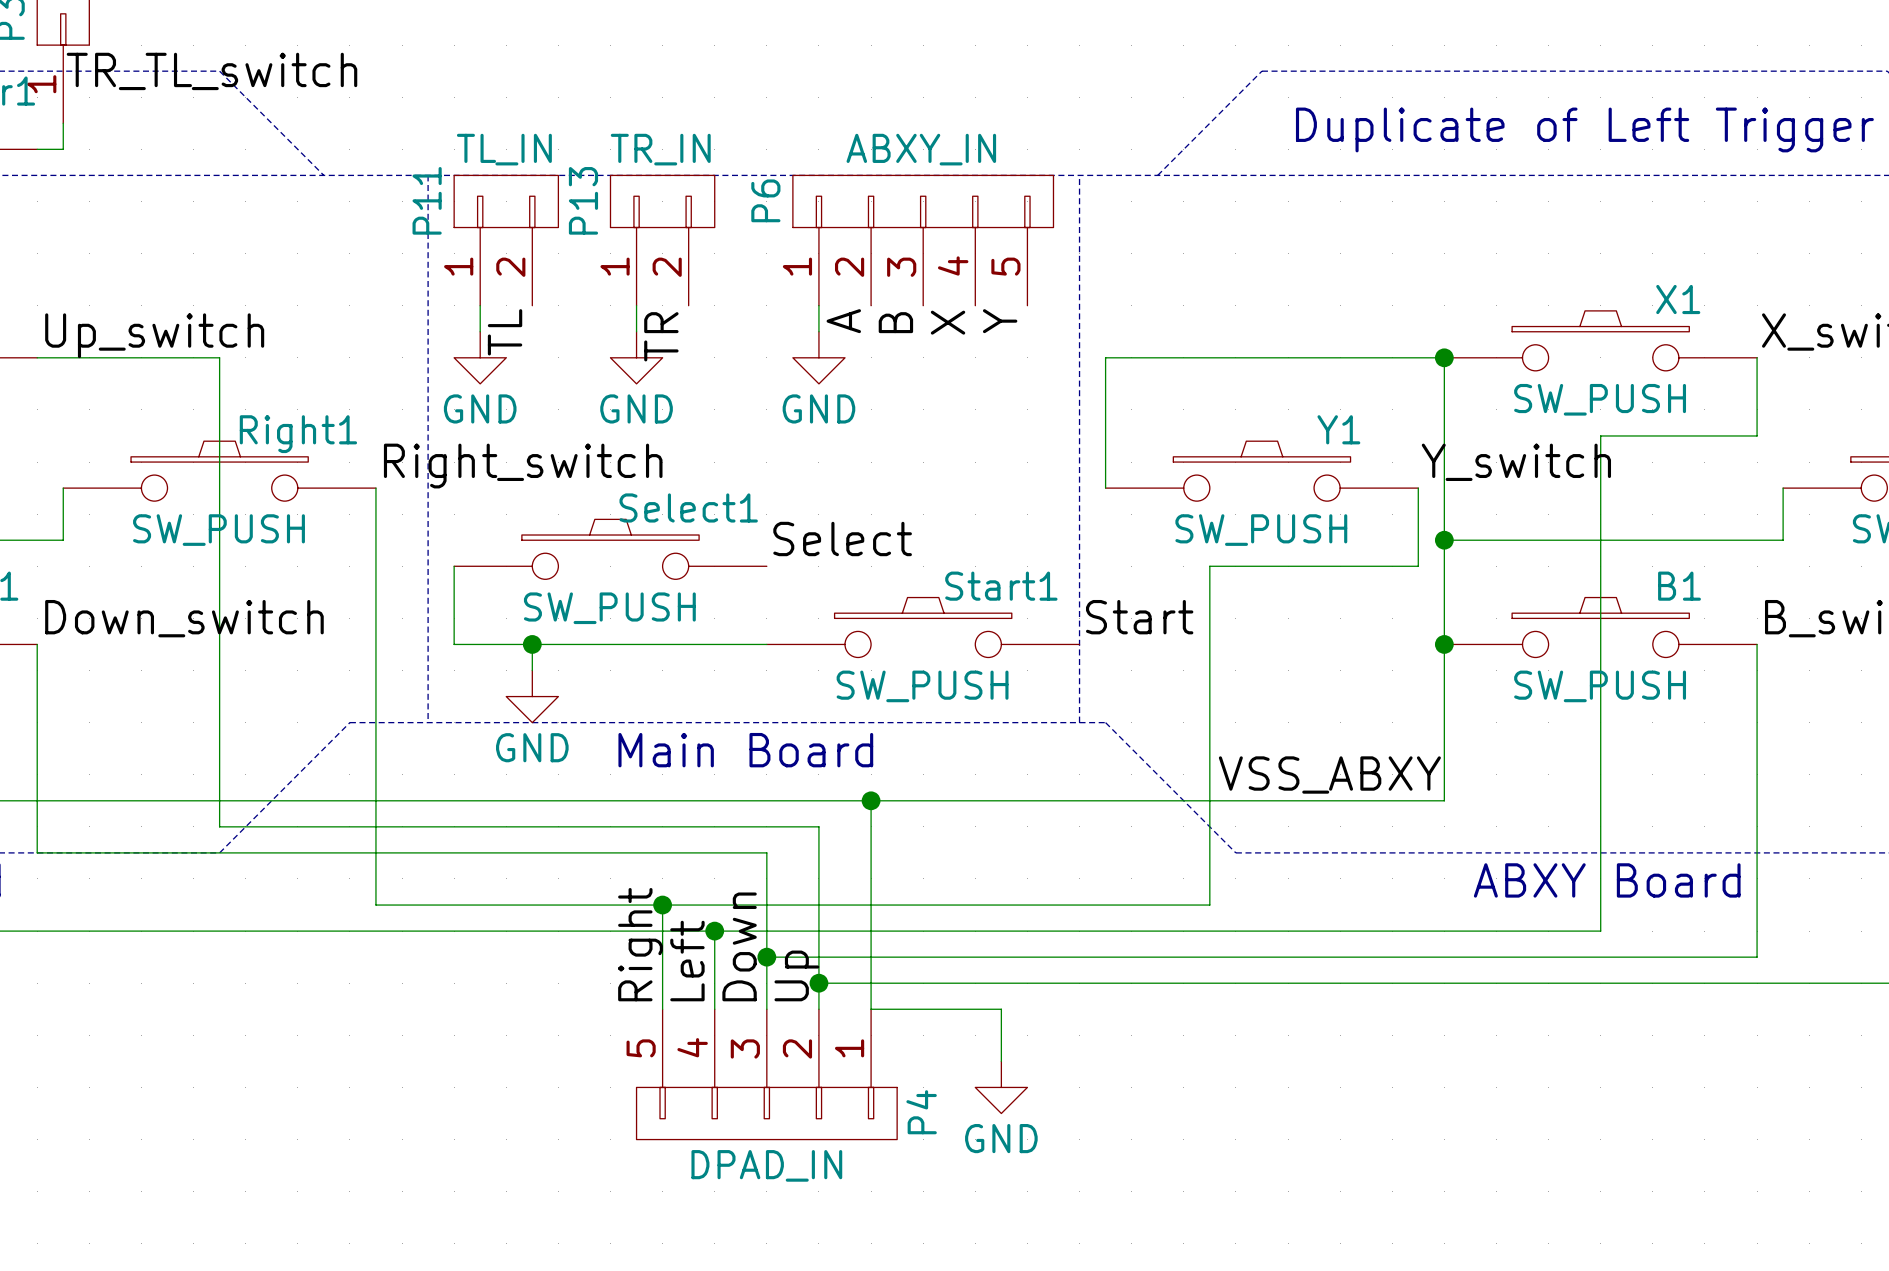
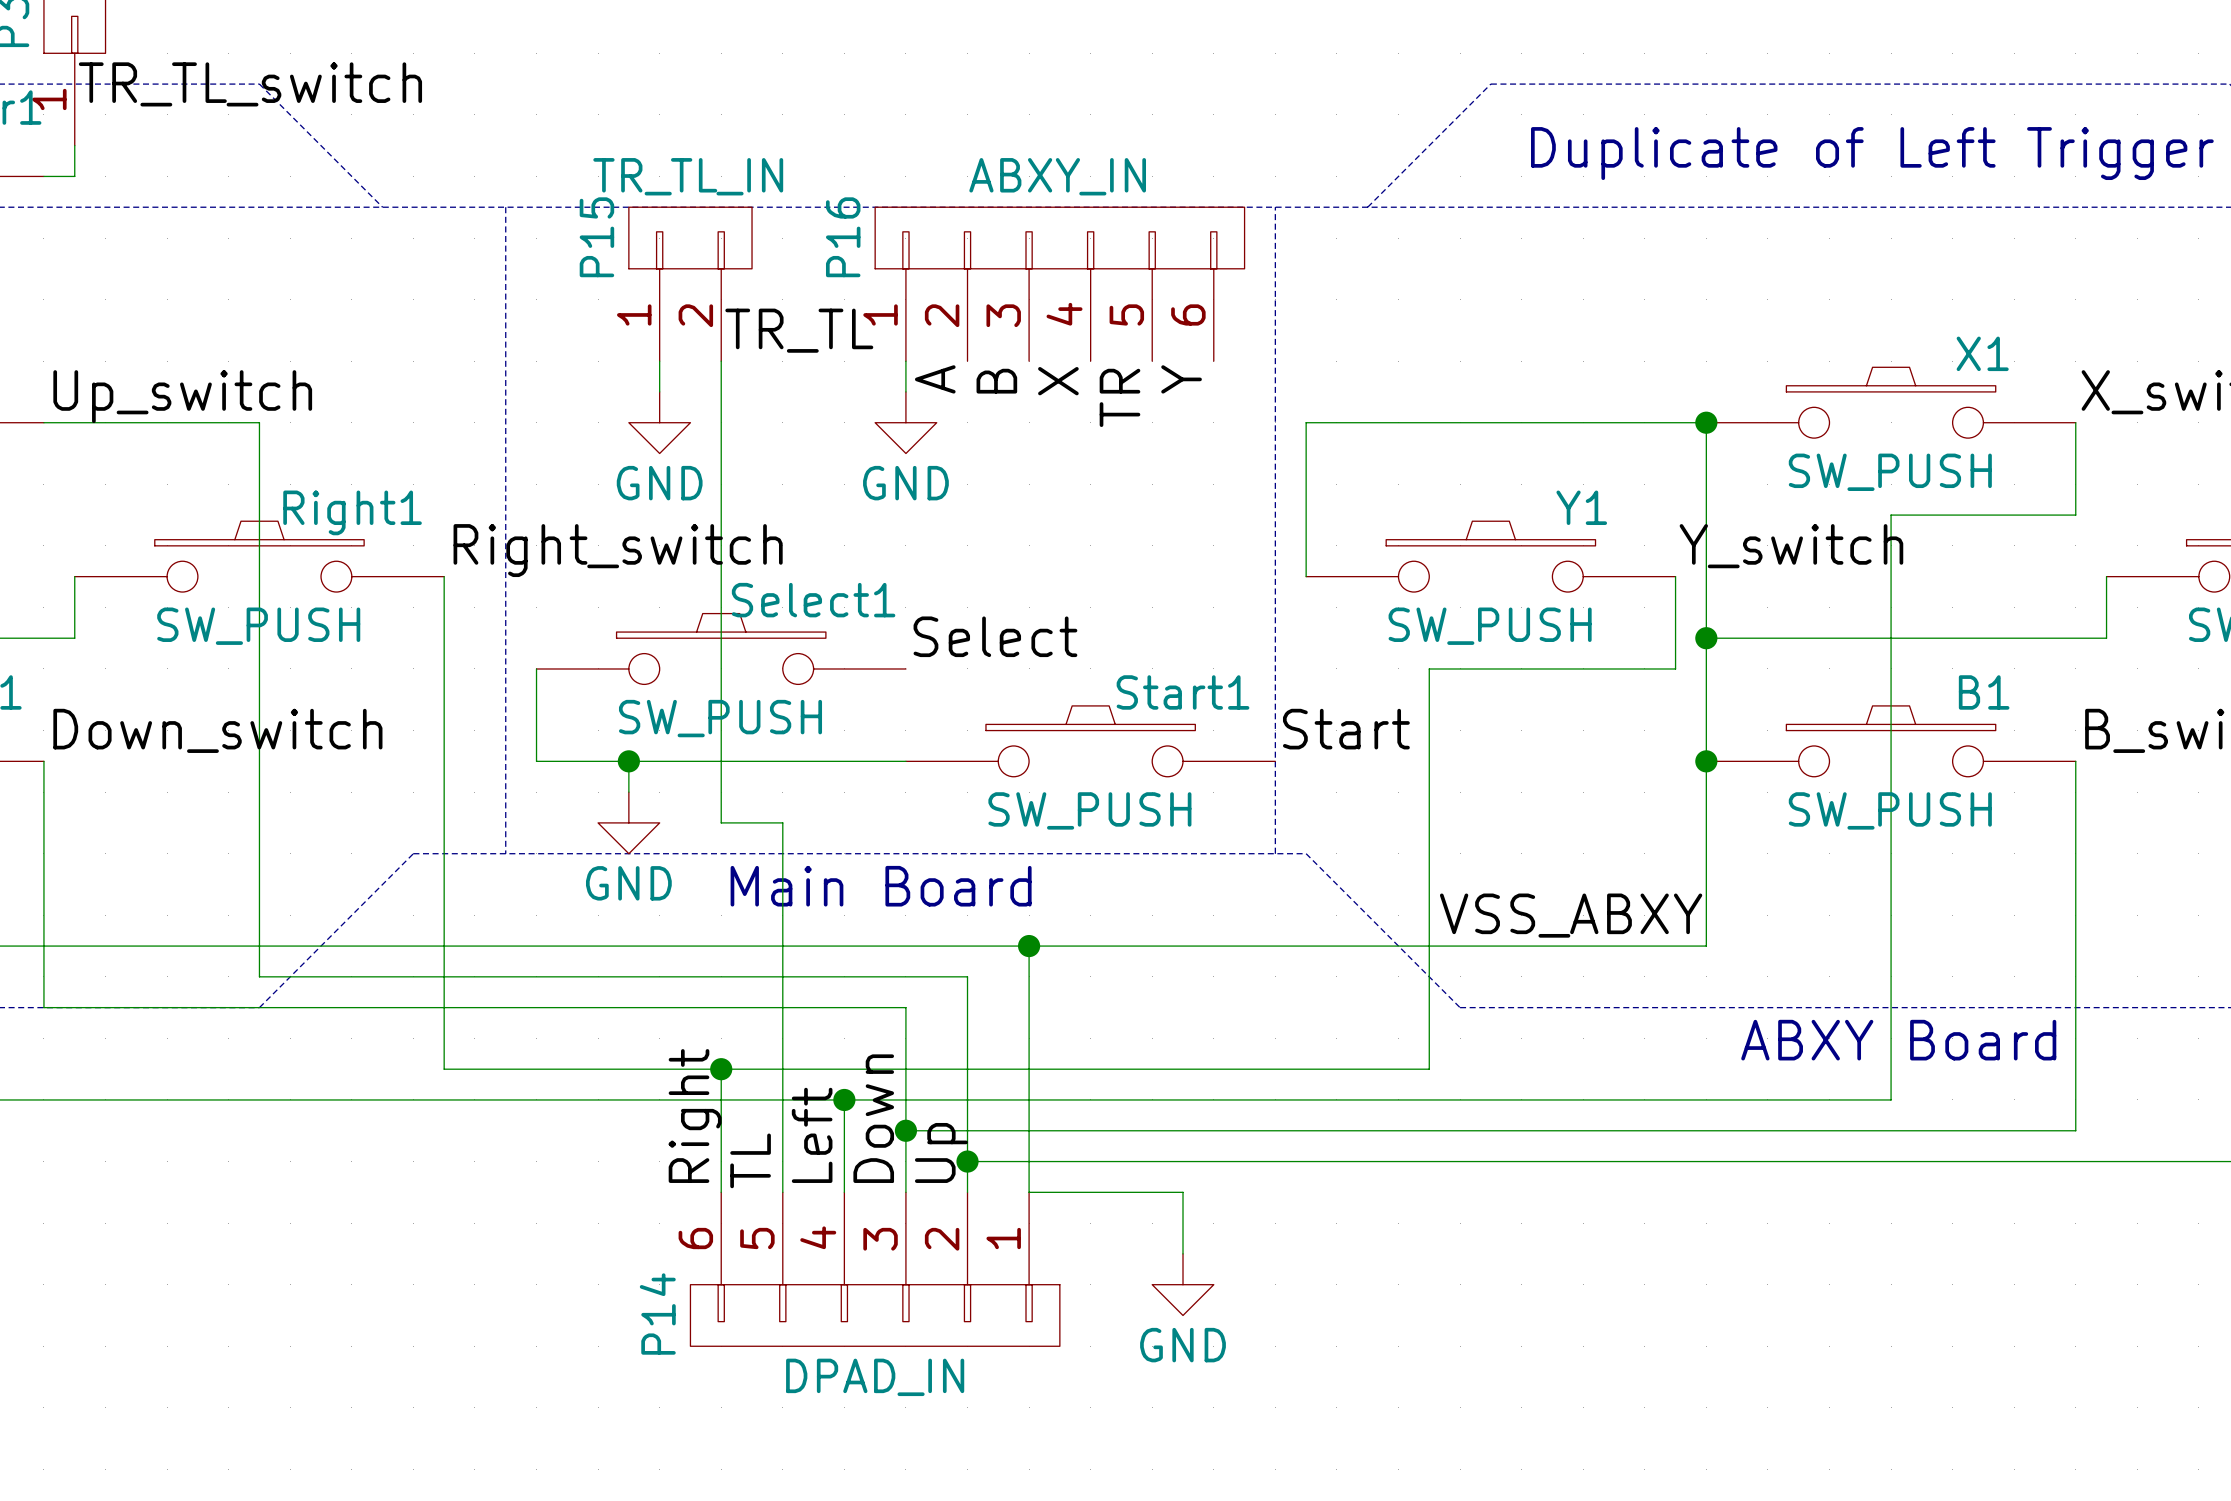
P11: TL_IN (506, 240) -> none
P15: none -> TR_TL_IN (690, 284)
P13: TR_IN (662, 240) -> none
P16: none -> ABXY_IN (1059, 284)
P6: ABXY_IN (923, 240) -> none
label: none -> TR_TL (799, 330)
wire: (480, 305) (480, 331) -> (659, 361) (659, 391)
wire: none -> (721, 361) (721, 822) (782, 822) (782, 1069)
wire: (636, 305) (636, 331) -> none
wire: (818, 305) (818, 331) -> (905, 361) (905, 391)
label: none -> A (935, 379)
label: A (843, 321) -> B (996, 381)
label: B (895, 322) -> X (1058, 381)
label: X (948, 322) -> TR (1119, 397)
label: TL (505, 332) -> none
label: TR (661, 336) -> none
power symbol: GND (480, 357) -> none
power symbol: none -> GND (659, 422)
power symbol: GND (636, 357) -> none
power symbol position: GND (818, 357) -> GND (905, 422)
wire: none -> (721, 1069) (721, 1192)
junction position: (662, 905) -> (721, 1069)
label: none -> Right (695, 1116)
label: Right (640, 944) -> TL (750, 1160)
P14: none -> DPAD_IN (875, 1269)
P4: DPAD_IN (766, 1074) -> none

